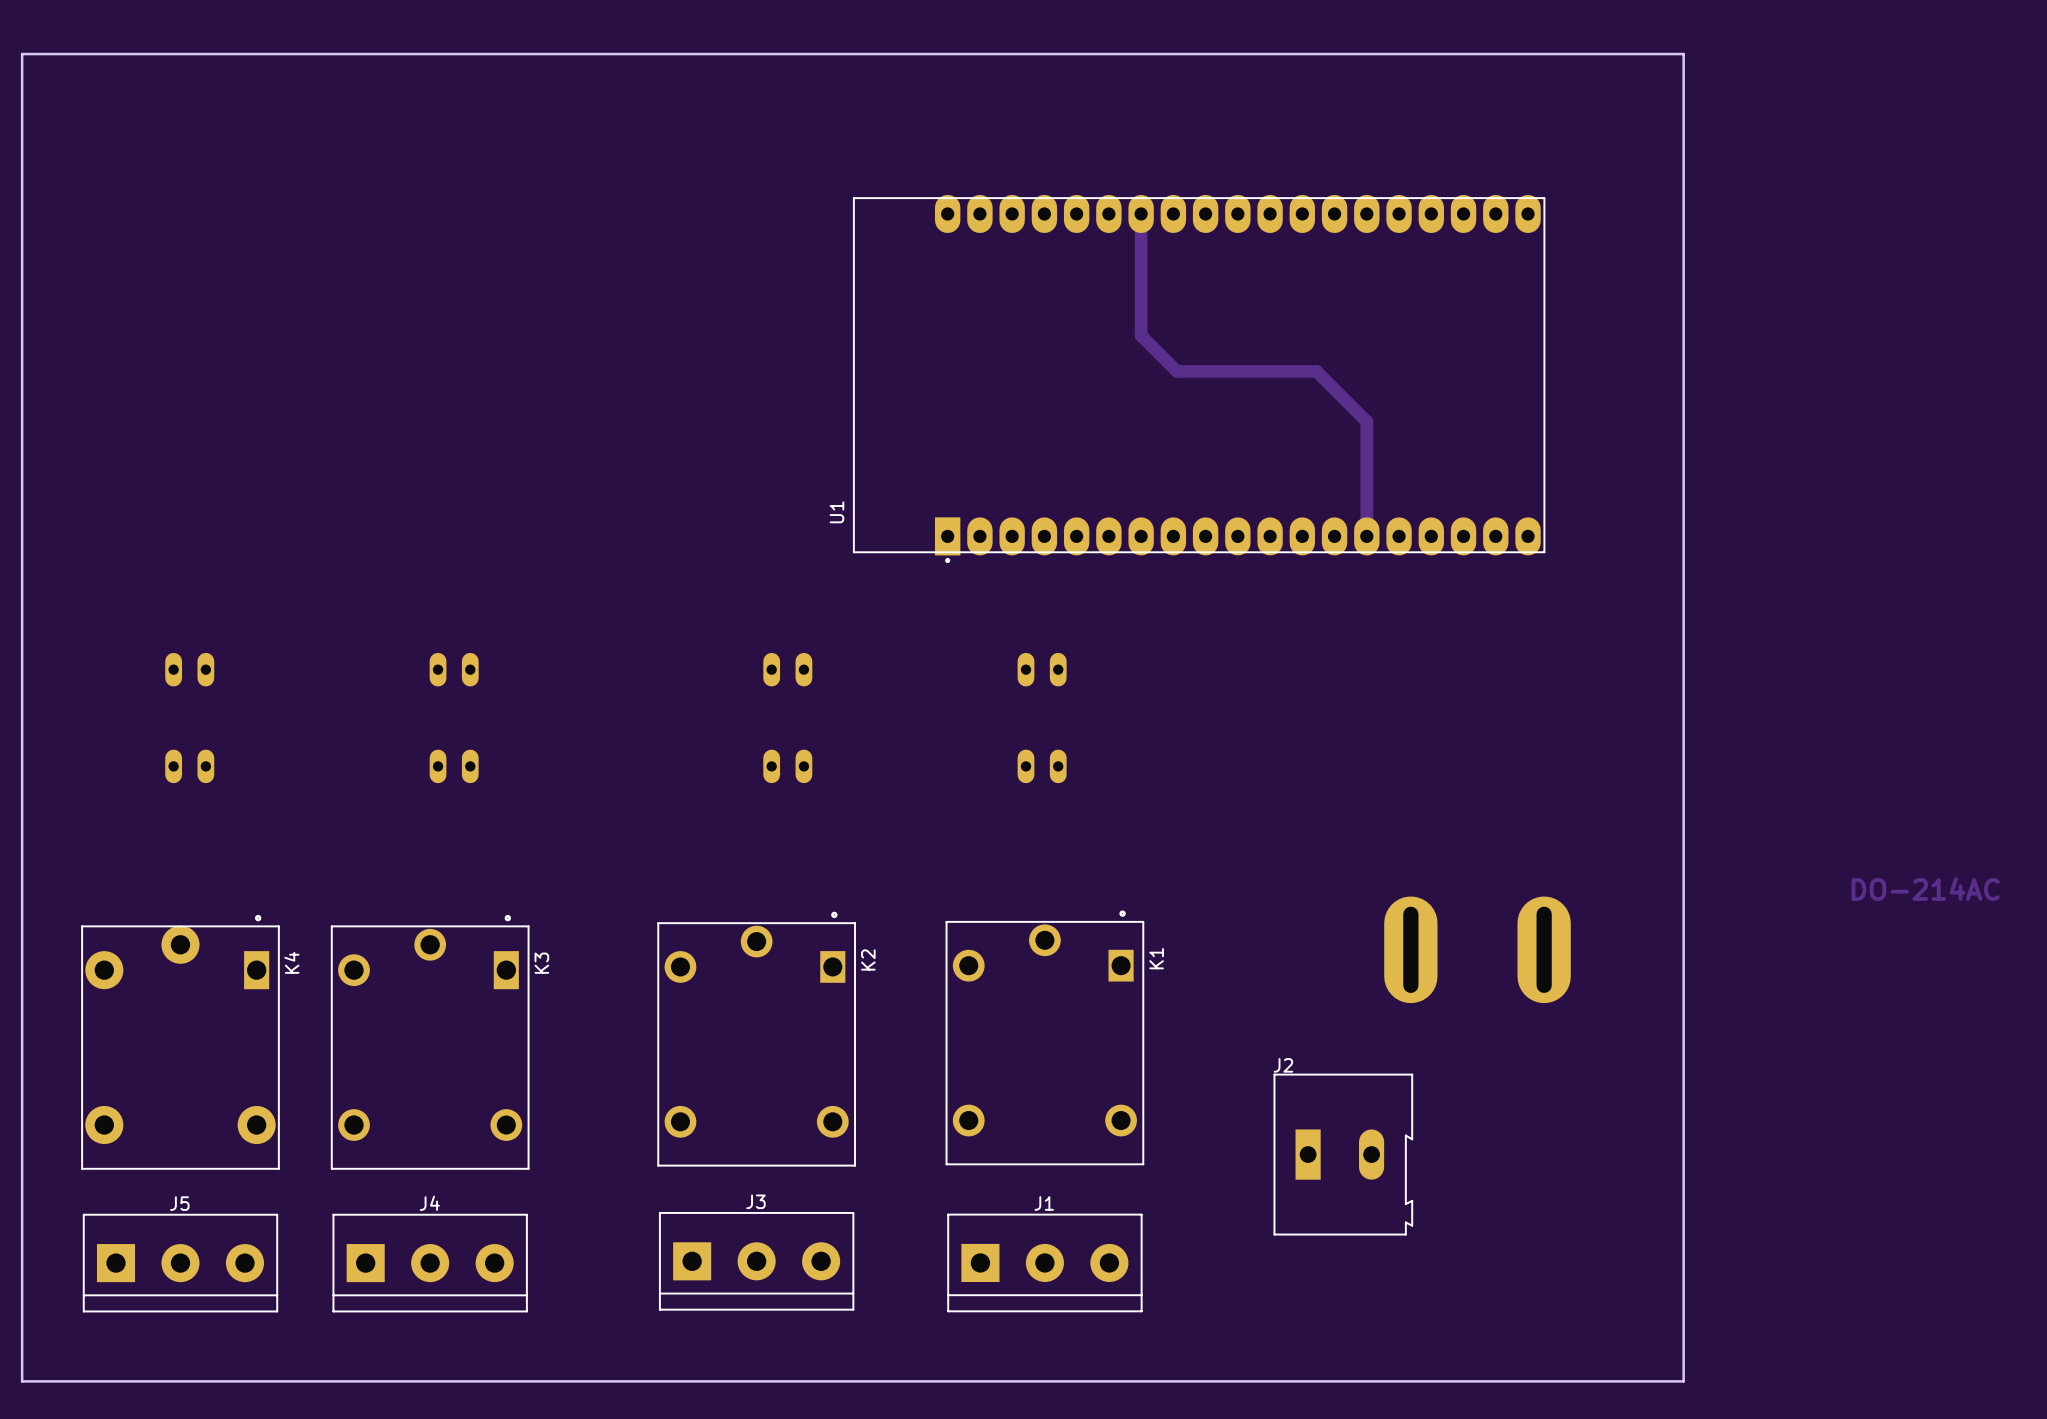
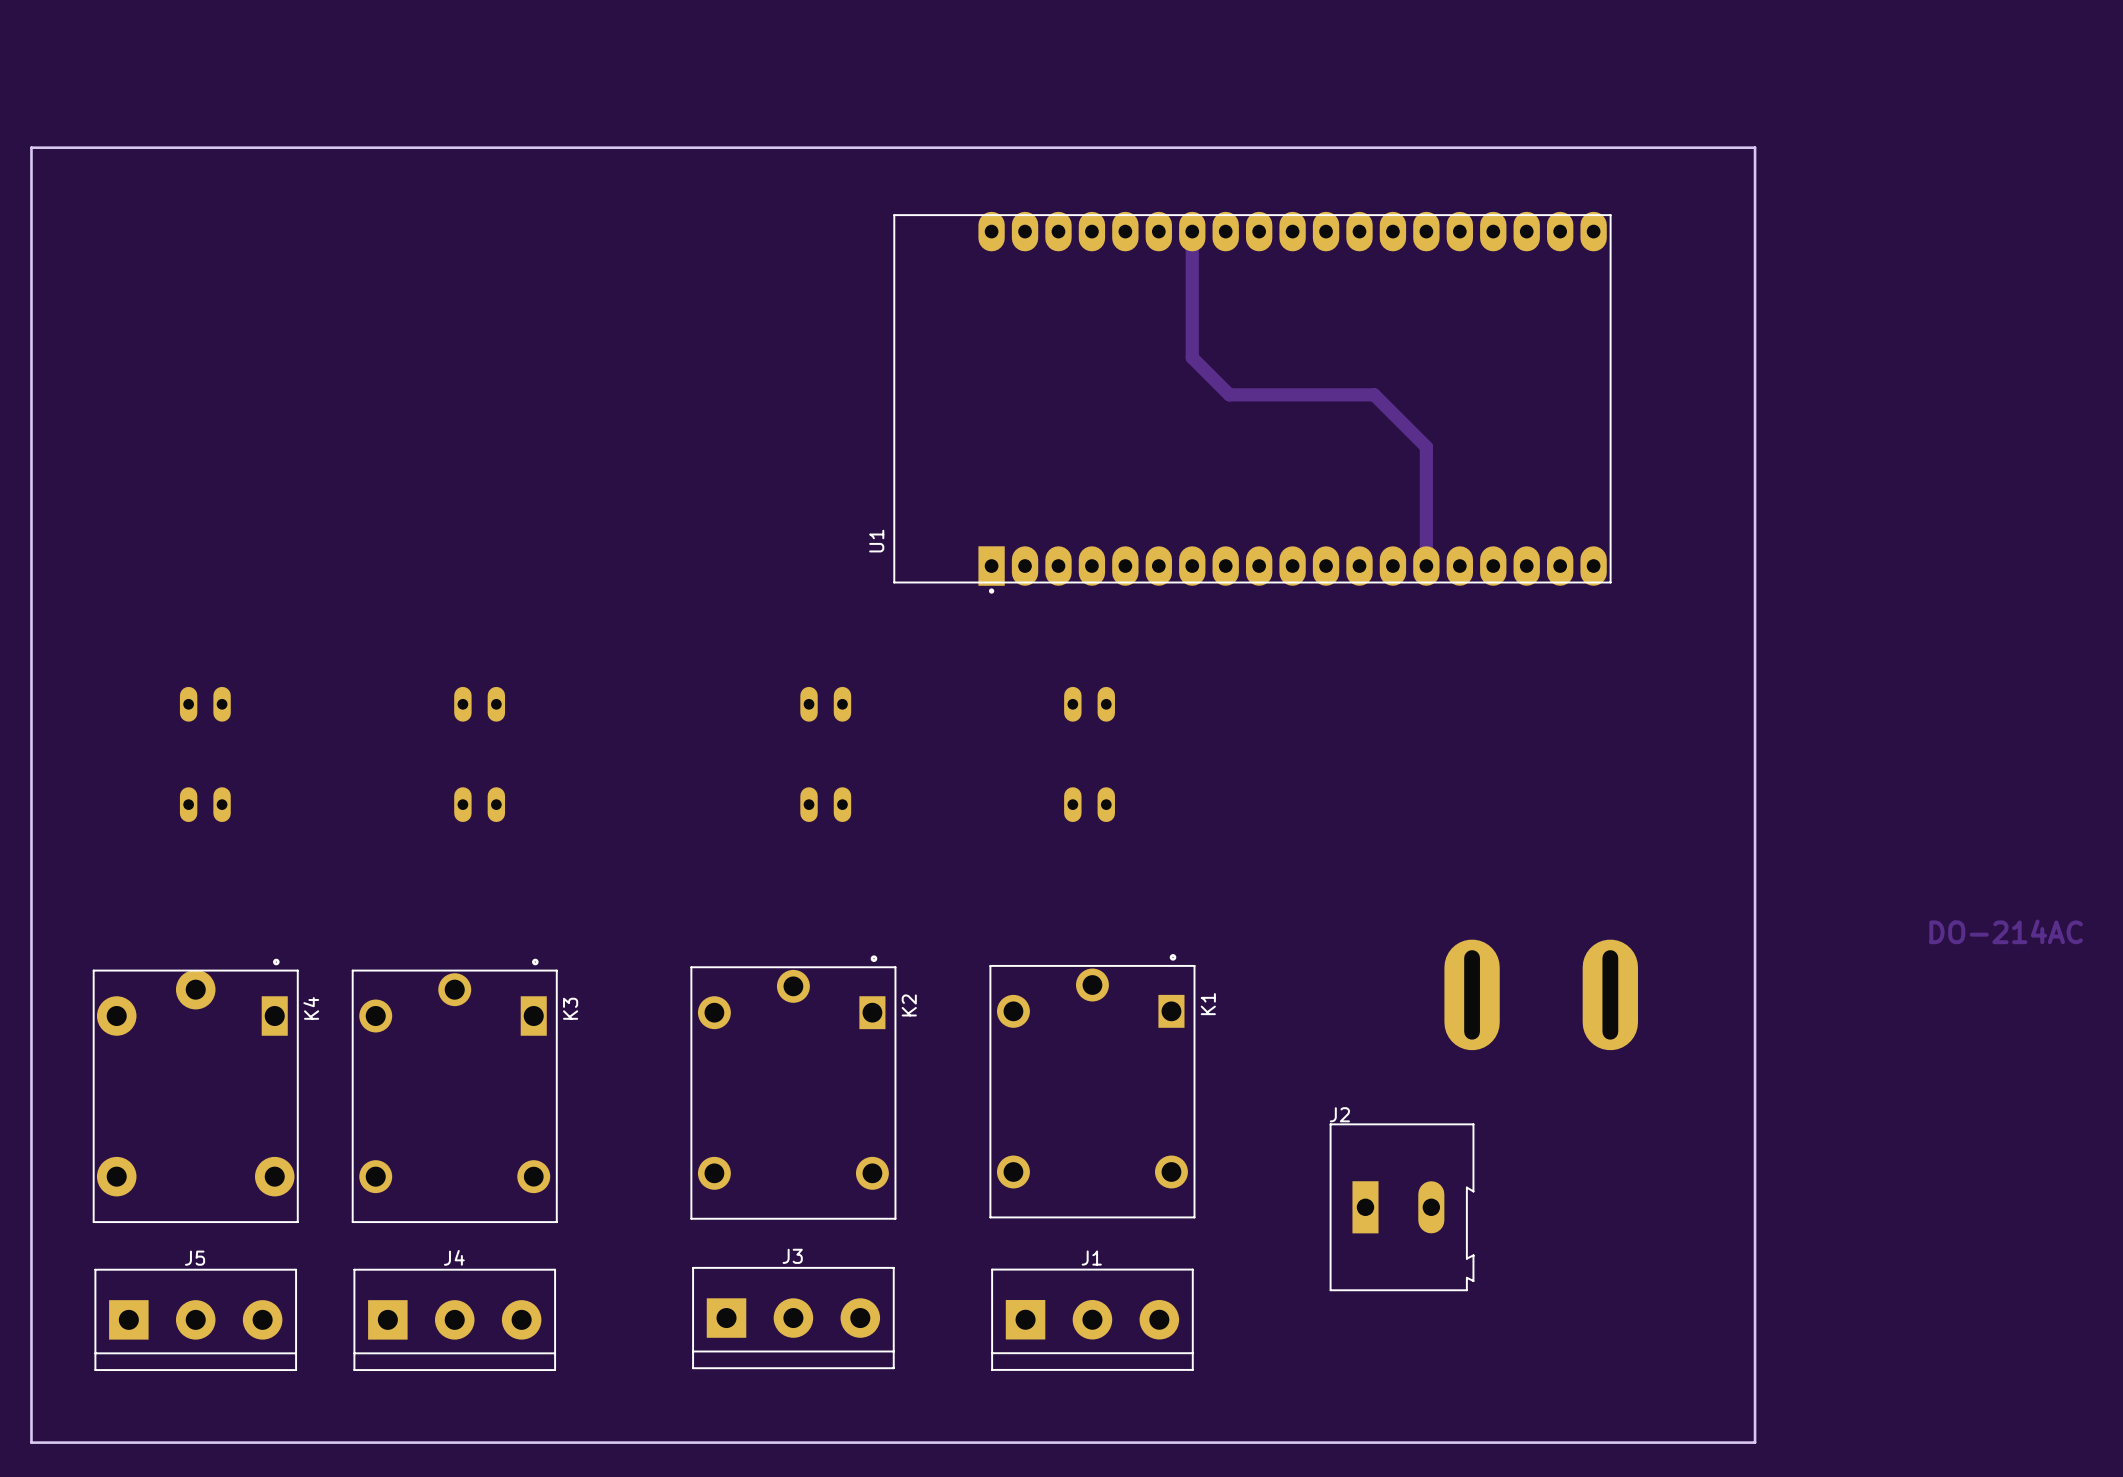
board edge: (22, 133) (22, 54) (1683, 54) (1683, 133) -> (31, 147) (1755, 147)

